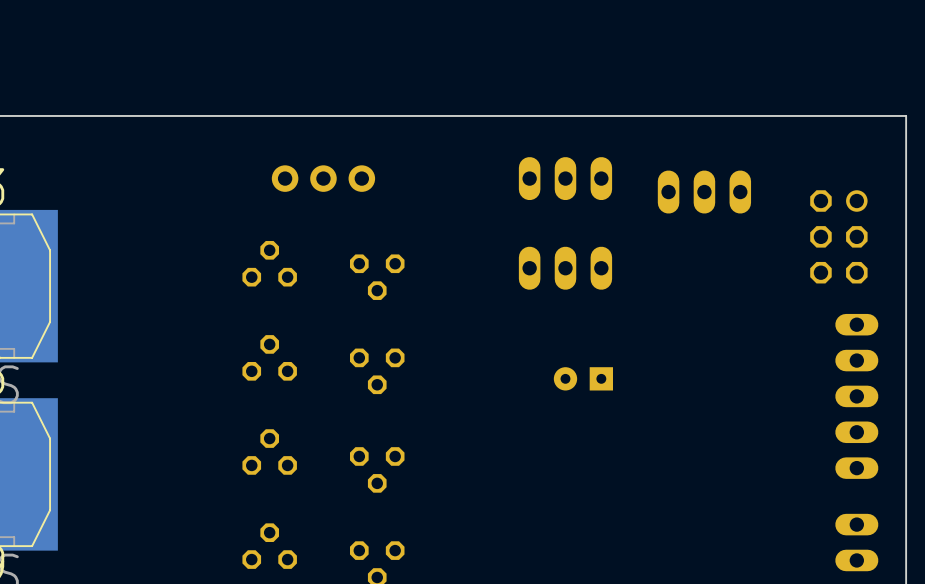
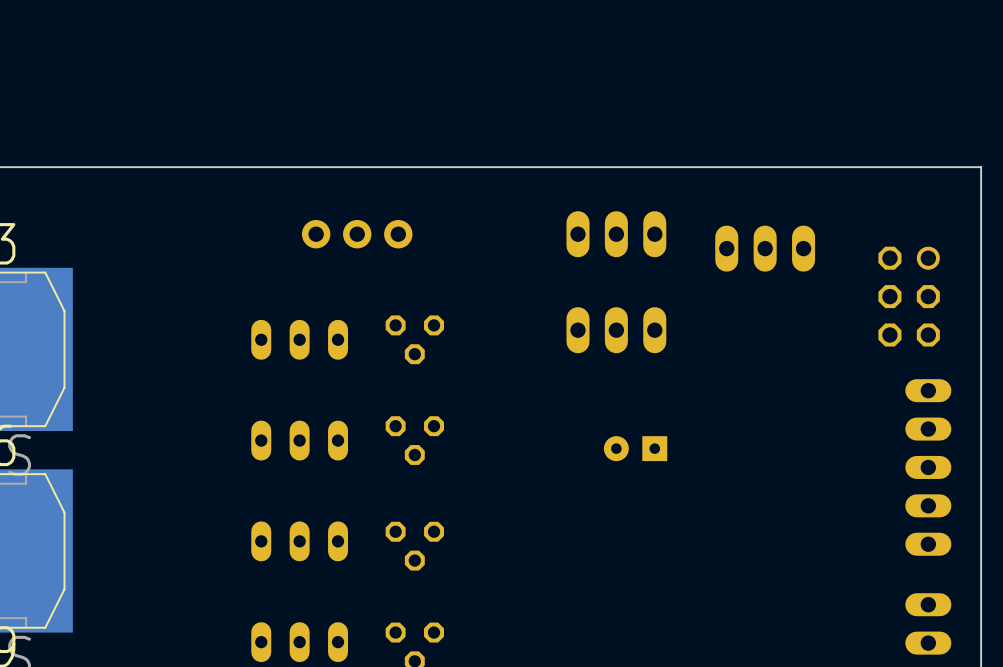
part footprint: [242, 240, 297, 287] -> [251, 319, 349, 360]
part footprint: [242, 335, 297, 381] -> [251, 420, 349, 461]
part footprint: [242, 429, 297, 475] -> [251, 521, 349, 562]
part footprint: [242, 523, 297, 569] -> [251, 622, 349, 663]

